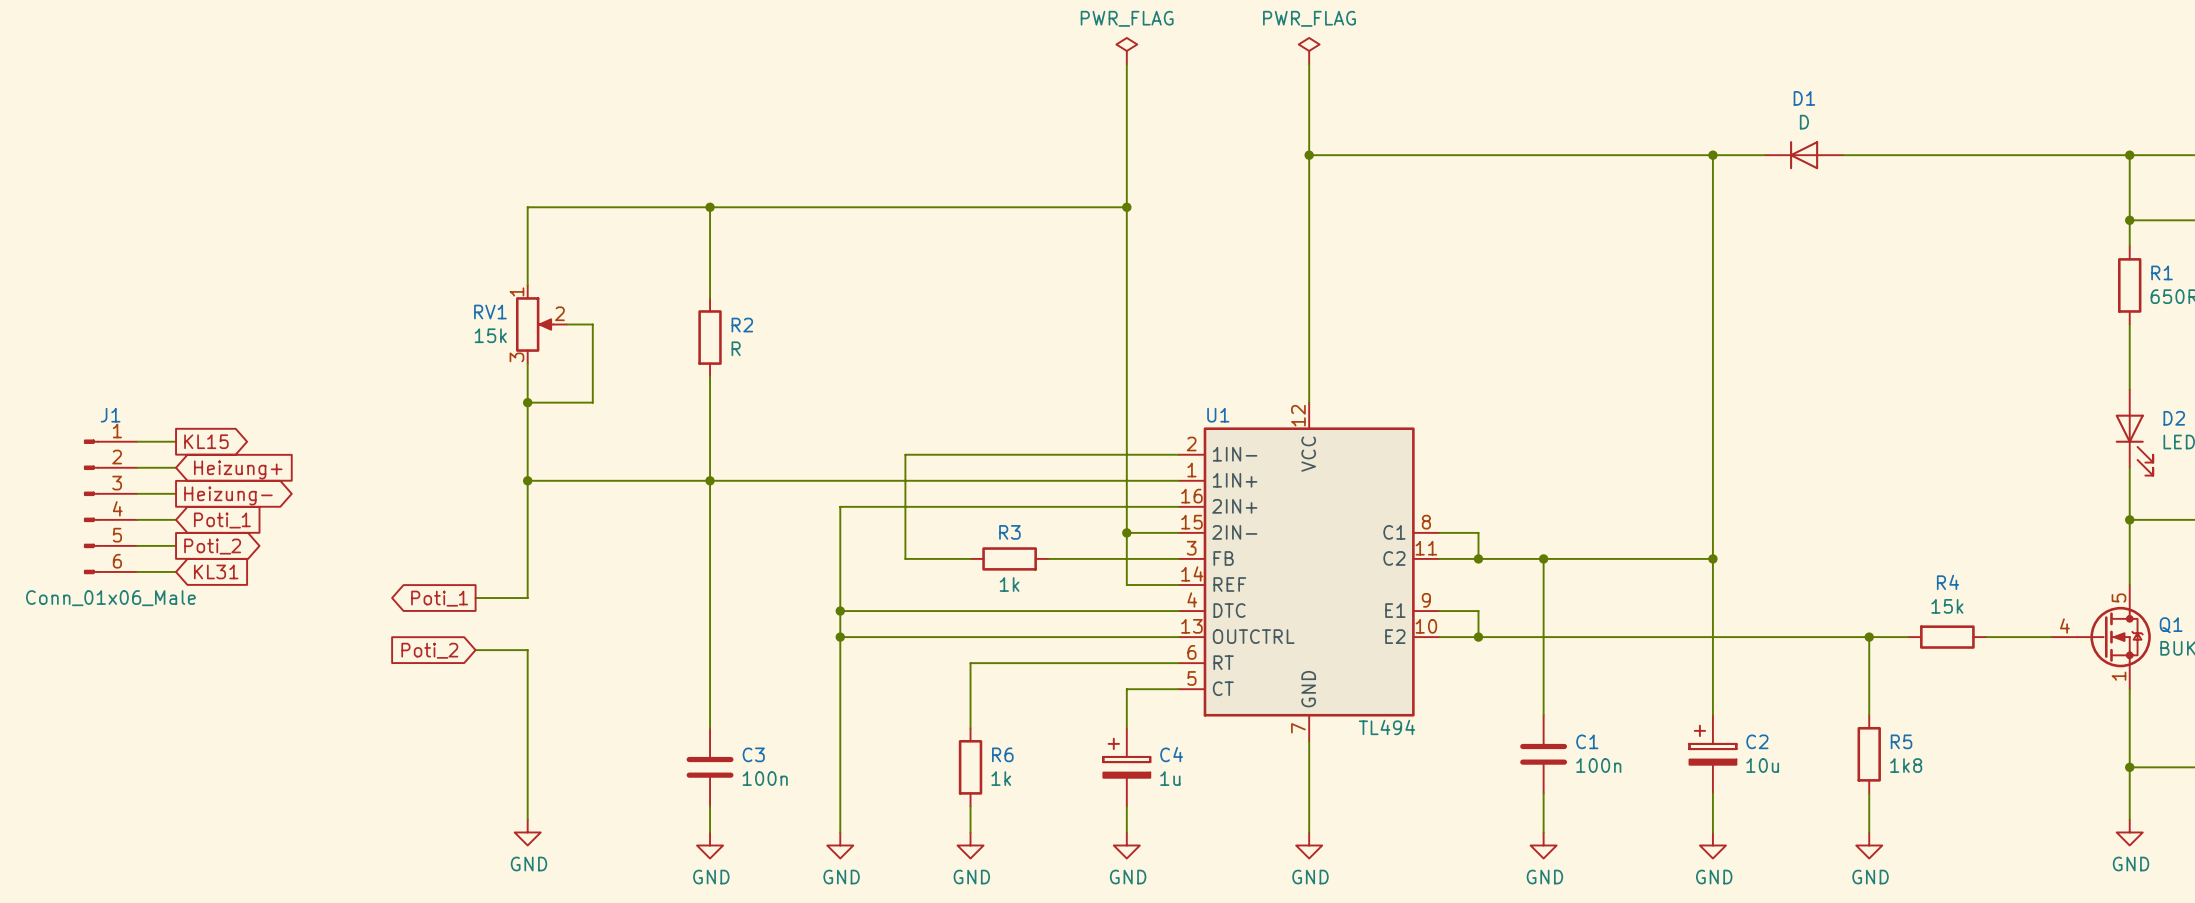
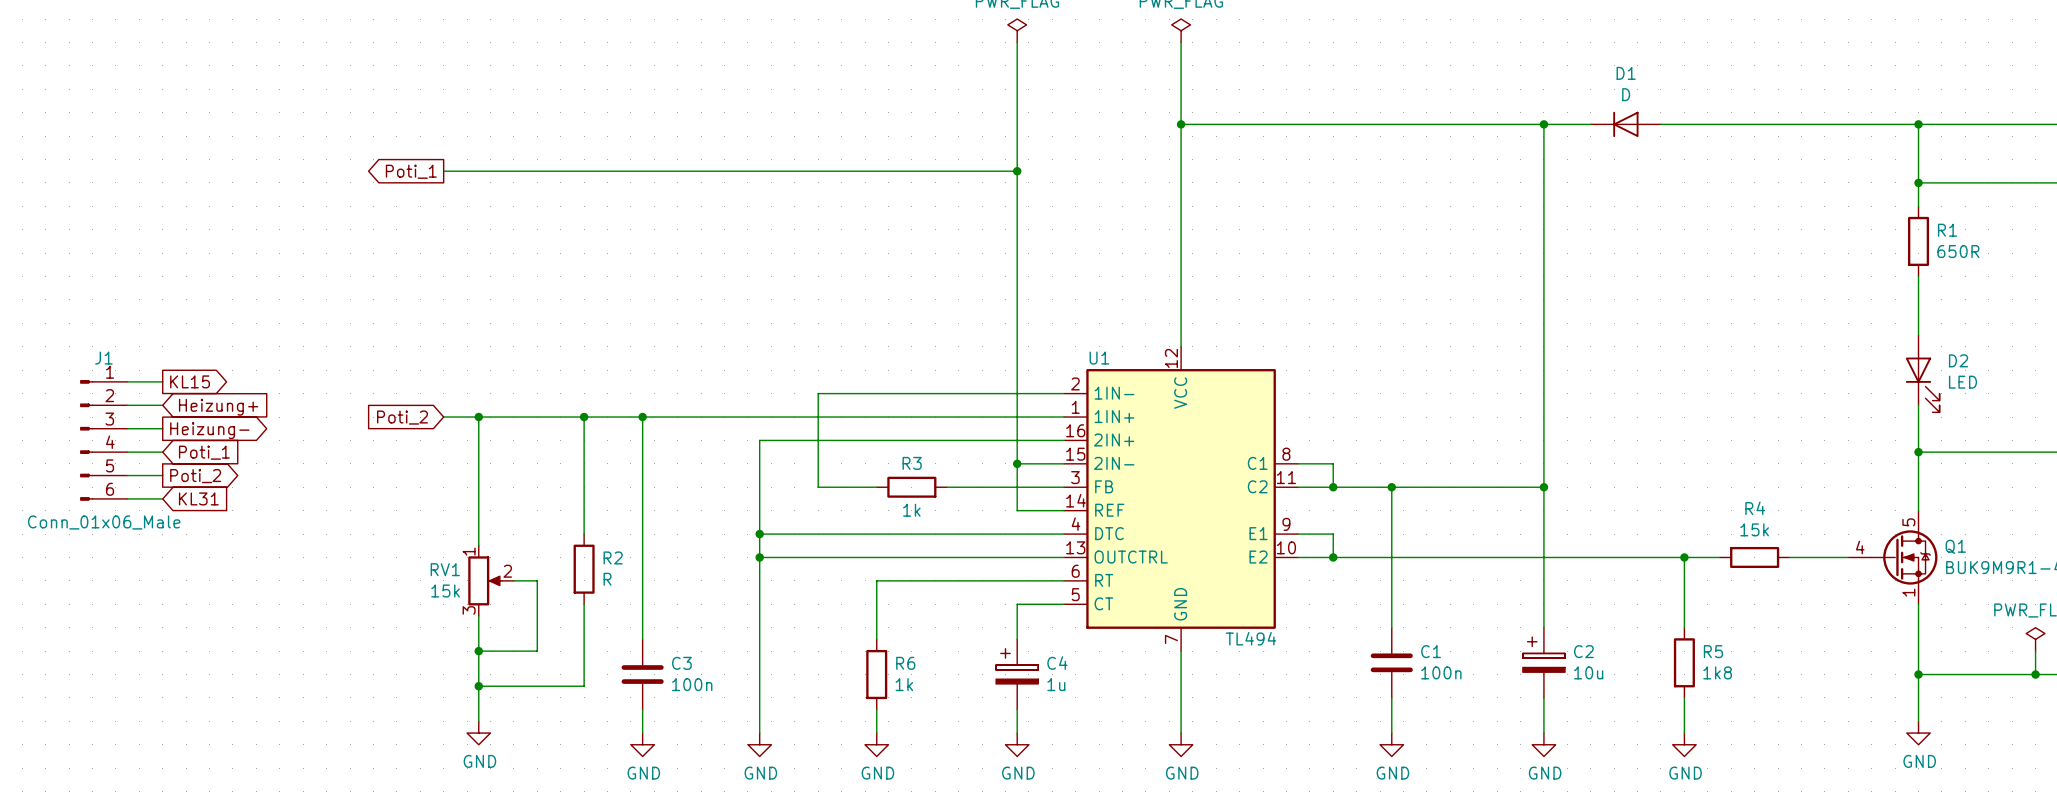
global label: none -> Poti_1 (411, 171)
wire: (527, 207) (527, 285) -> (478, 171) (443, 171)
wire: (710, 207) (710, 298) -> none
junction: (710, 207) -> none
RV1 position: (541, 324) -> (491, 580)
wire: (566, 324) (592, 324) (592, 402) (527, 402) -> none
R2 position: (710, 337) -> (584, 569)
wire: (527, 363) (527, 480) -> (443, 417) (478, 417)
wire: (710, 376) (710, 480) -> none
junction: (527, 402) -> none
wire: none -> (584, 417) (584, 534)
junction: none -> (584, 417)
global label: Poti_1 (439, 598) -> none
wire: (475, 598) (527, 598) -> (478, 545) (478, 522)
global label position: Poti_2 (429, 650) -> Poti_2 (402, 417)
wire: (475, 650) (527, 650) (527, 702) -> none
wire: none -> (513, 580) (537, 580) (537, 651) (478, 651)
wire: none -> (584, 604) (584, 686) (478, 686)
junction: none -> (478, 651)
junction: none -> (478, 686)

